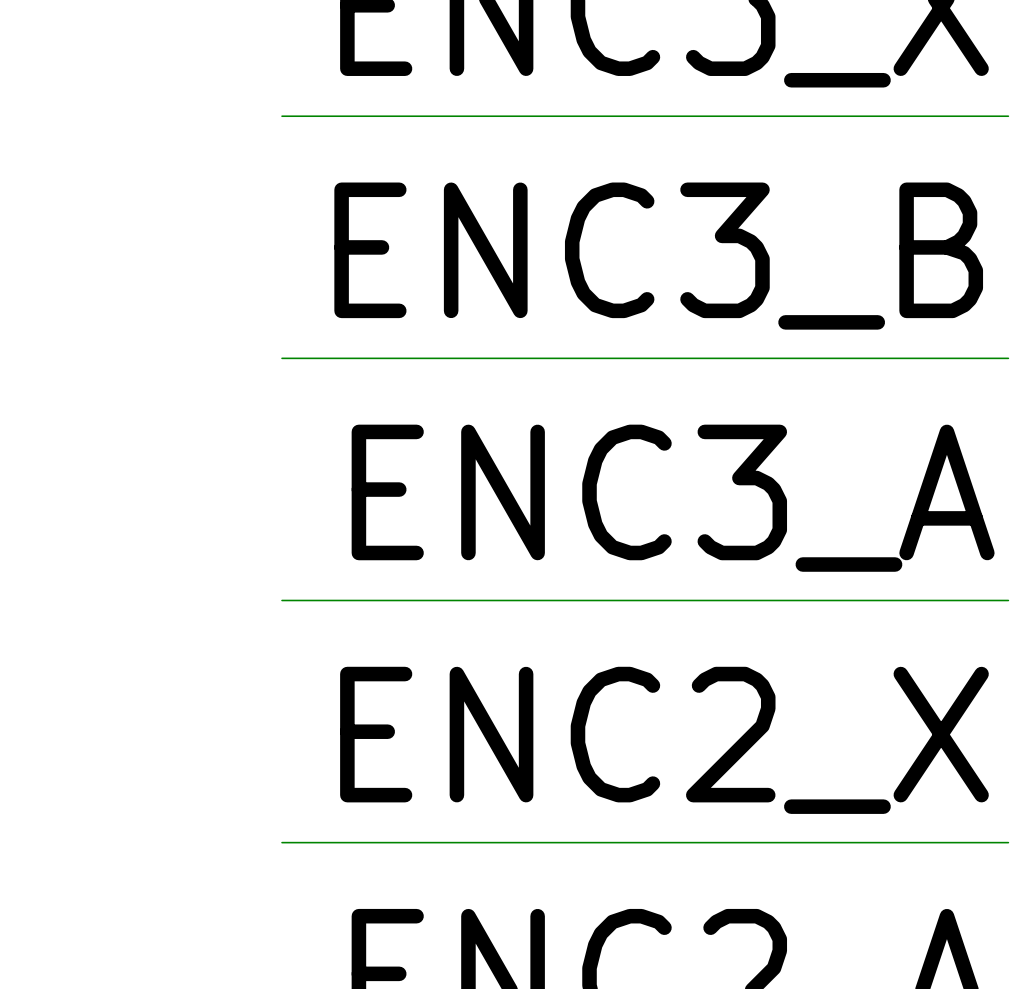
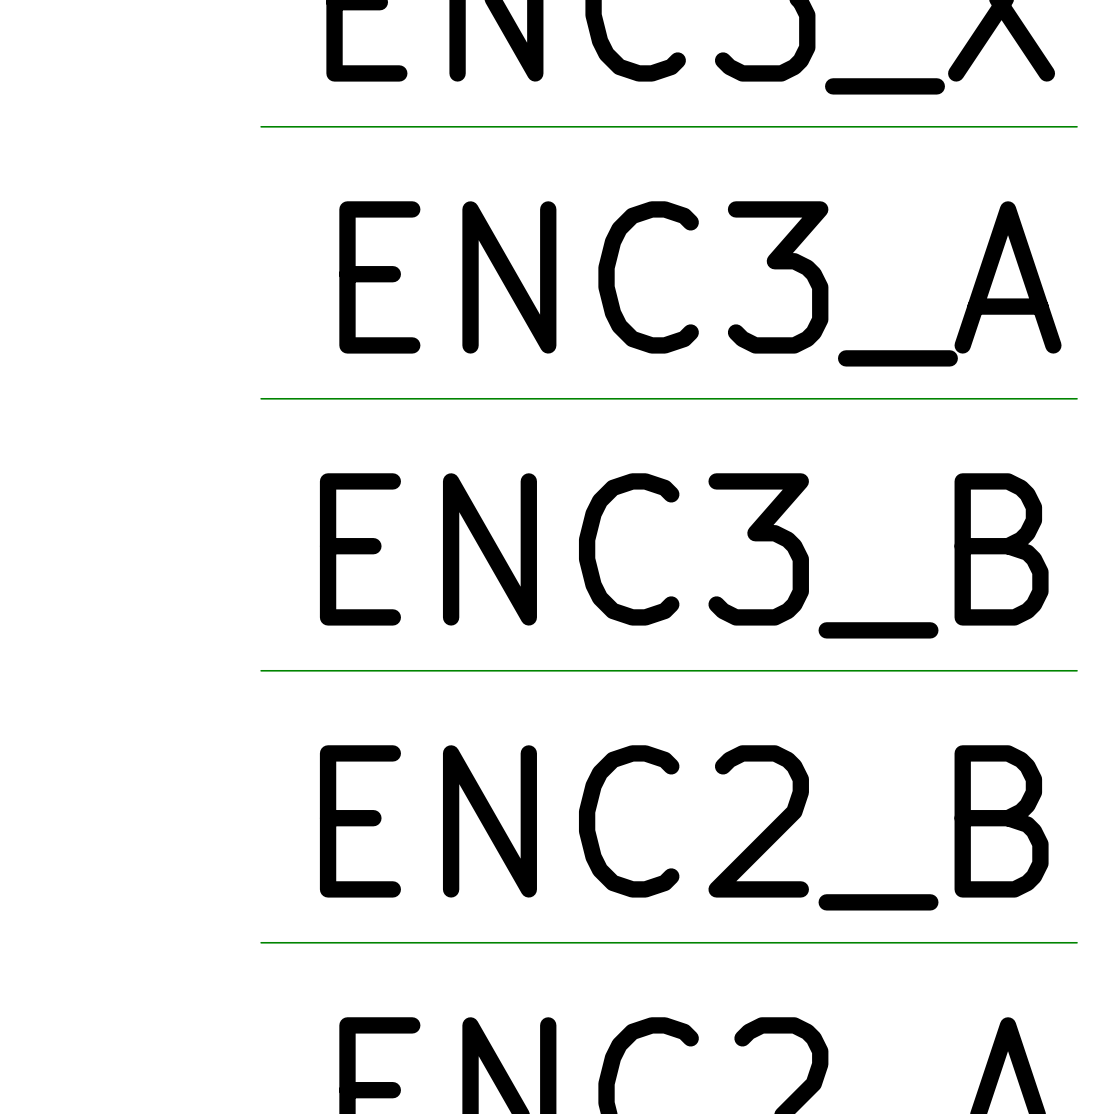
label: ENC3_B (658, 256) -> ENC3_A (700, 283)
label: ENC3_A (673, 498) -> ENC3_B (684, 555)
label: ENC2_X (664, 740) -> ENC2_B (684, 827)

